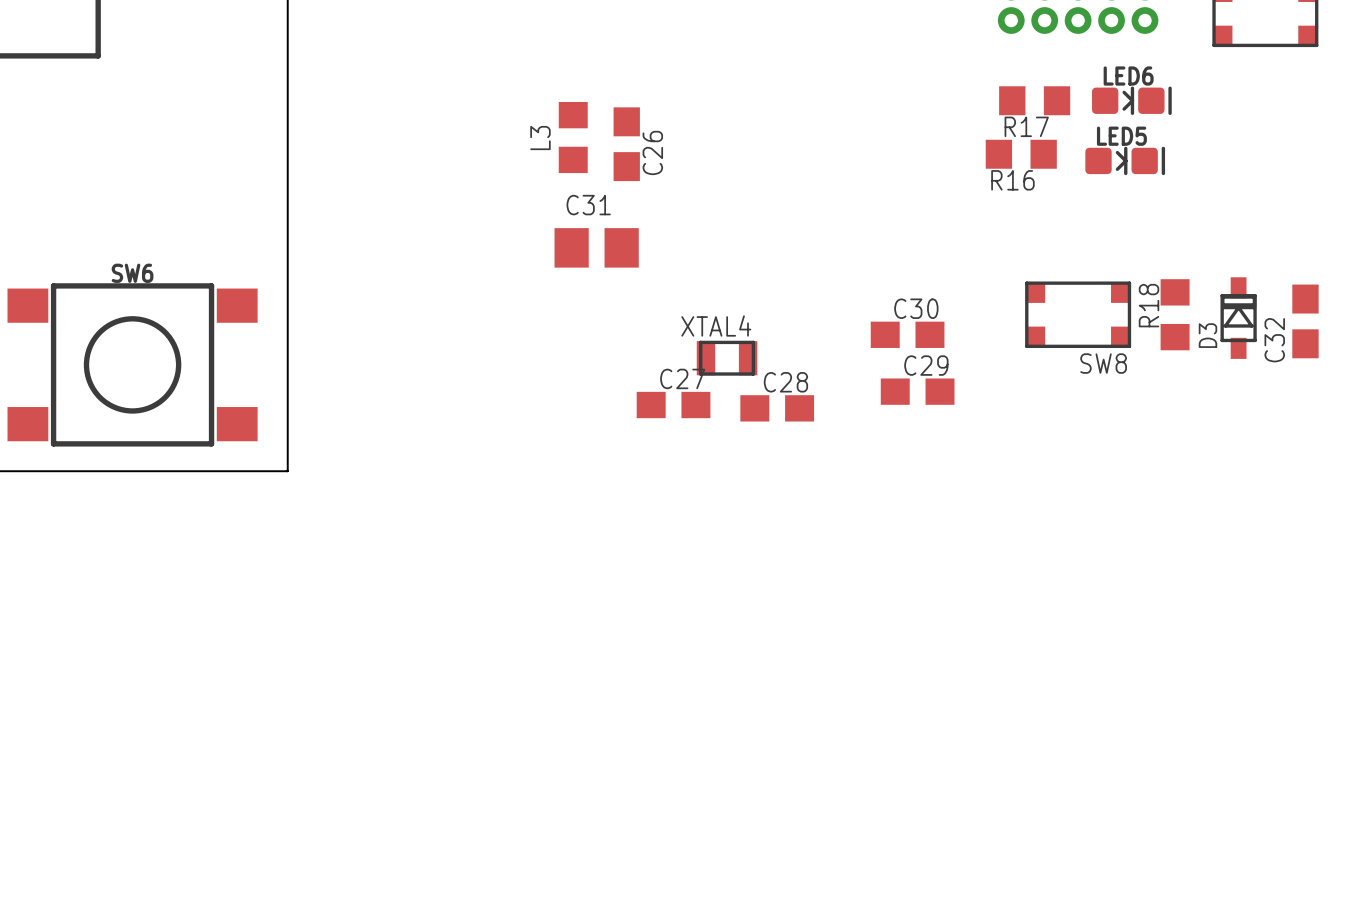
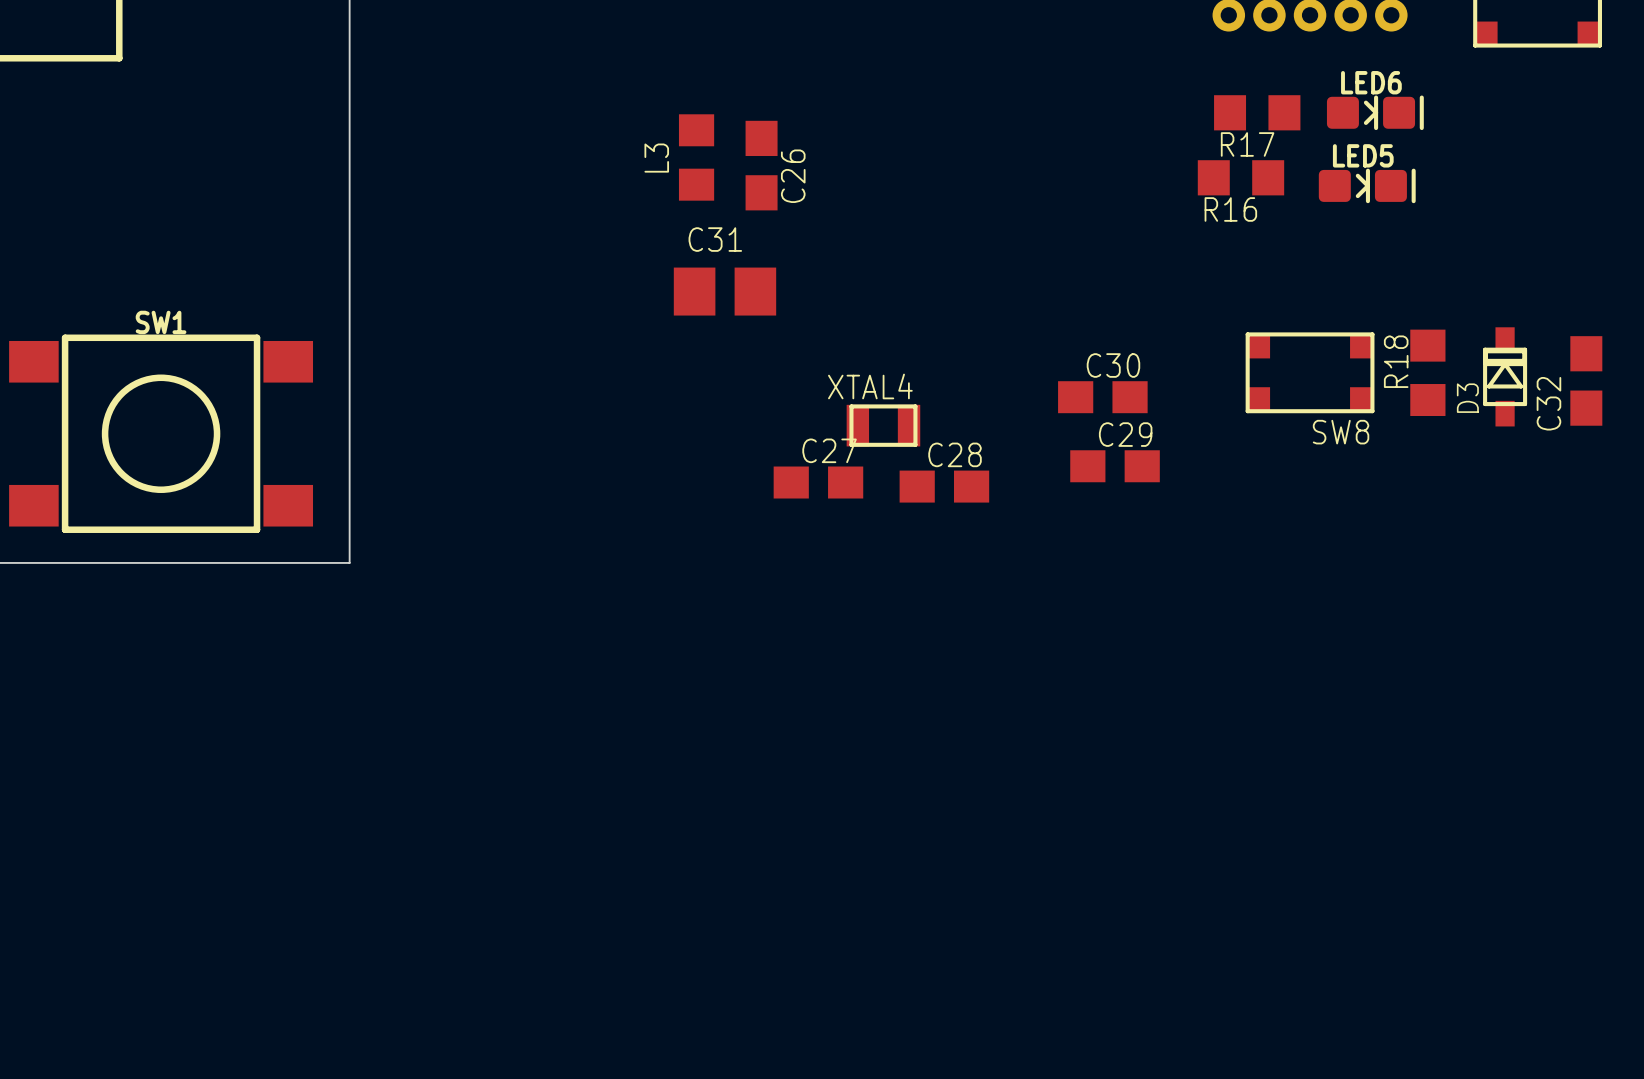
SW6 name: SW6 (132, 273) -> SW1 (161, 322)

